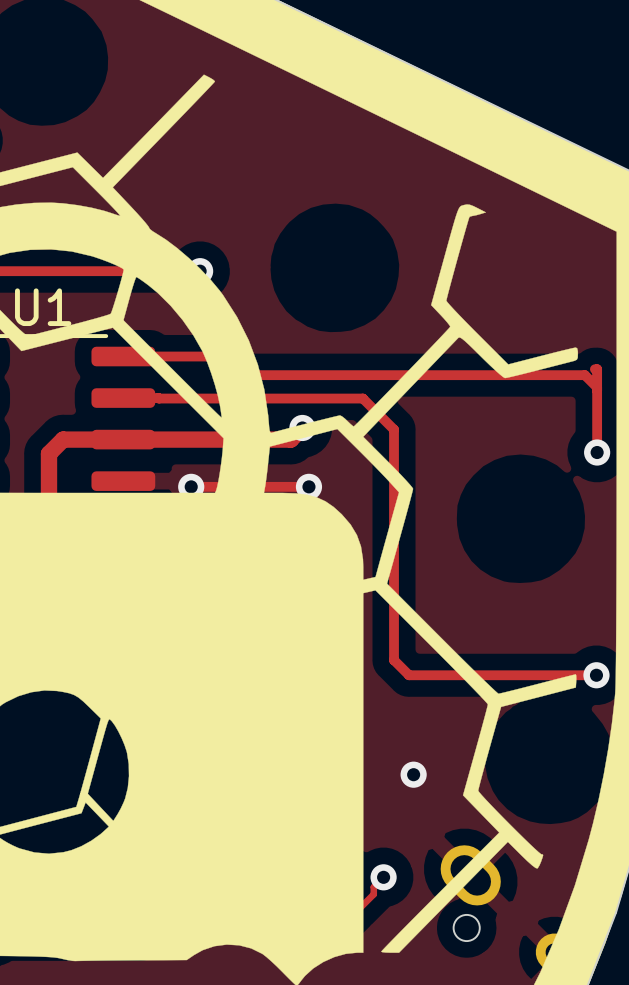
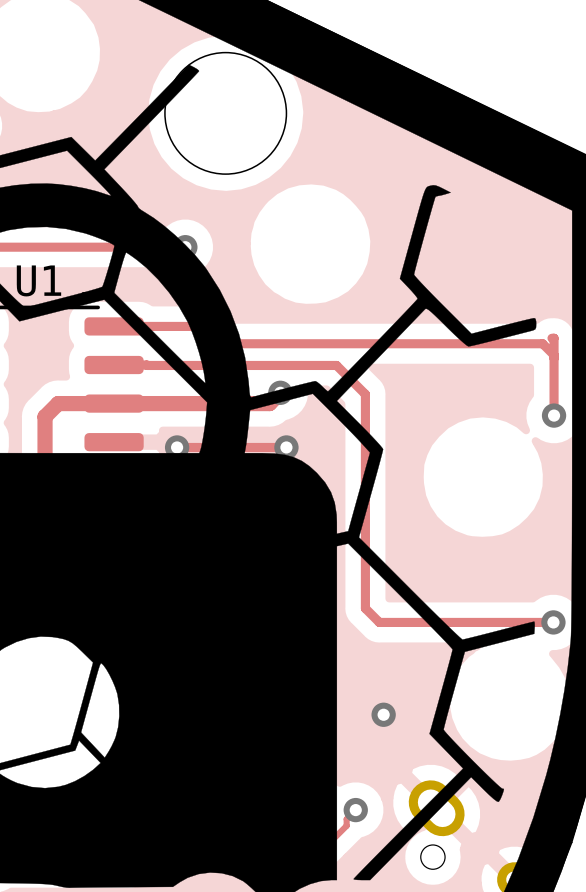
round board edge: none -> [164, 51, 288, 175]

